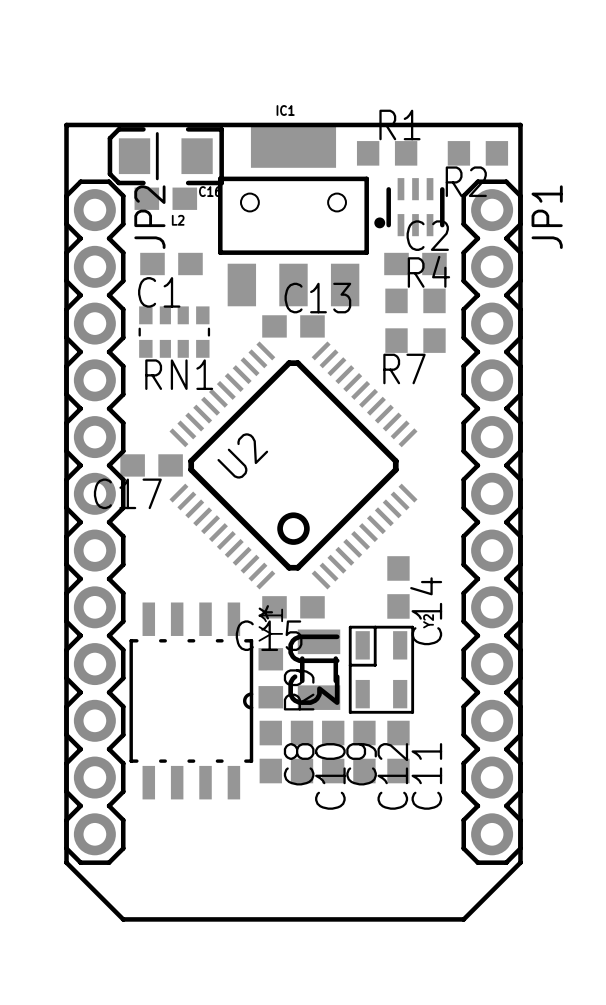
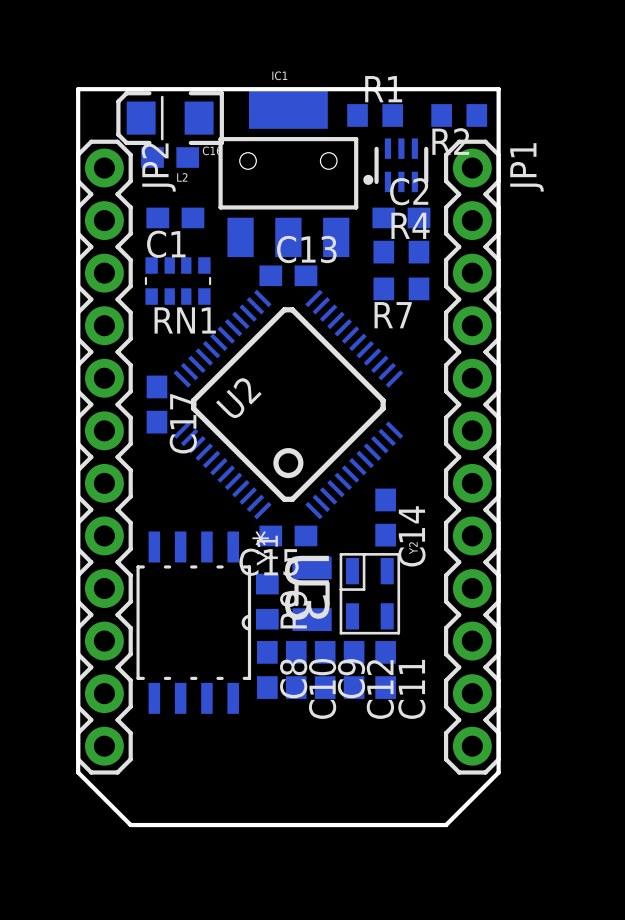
C17 rotation: 0° (151, 465) -> 90° clockwise (156, 404)
C17 name position: C17 (127, 493) -> C17 (183, 423)

